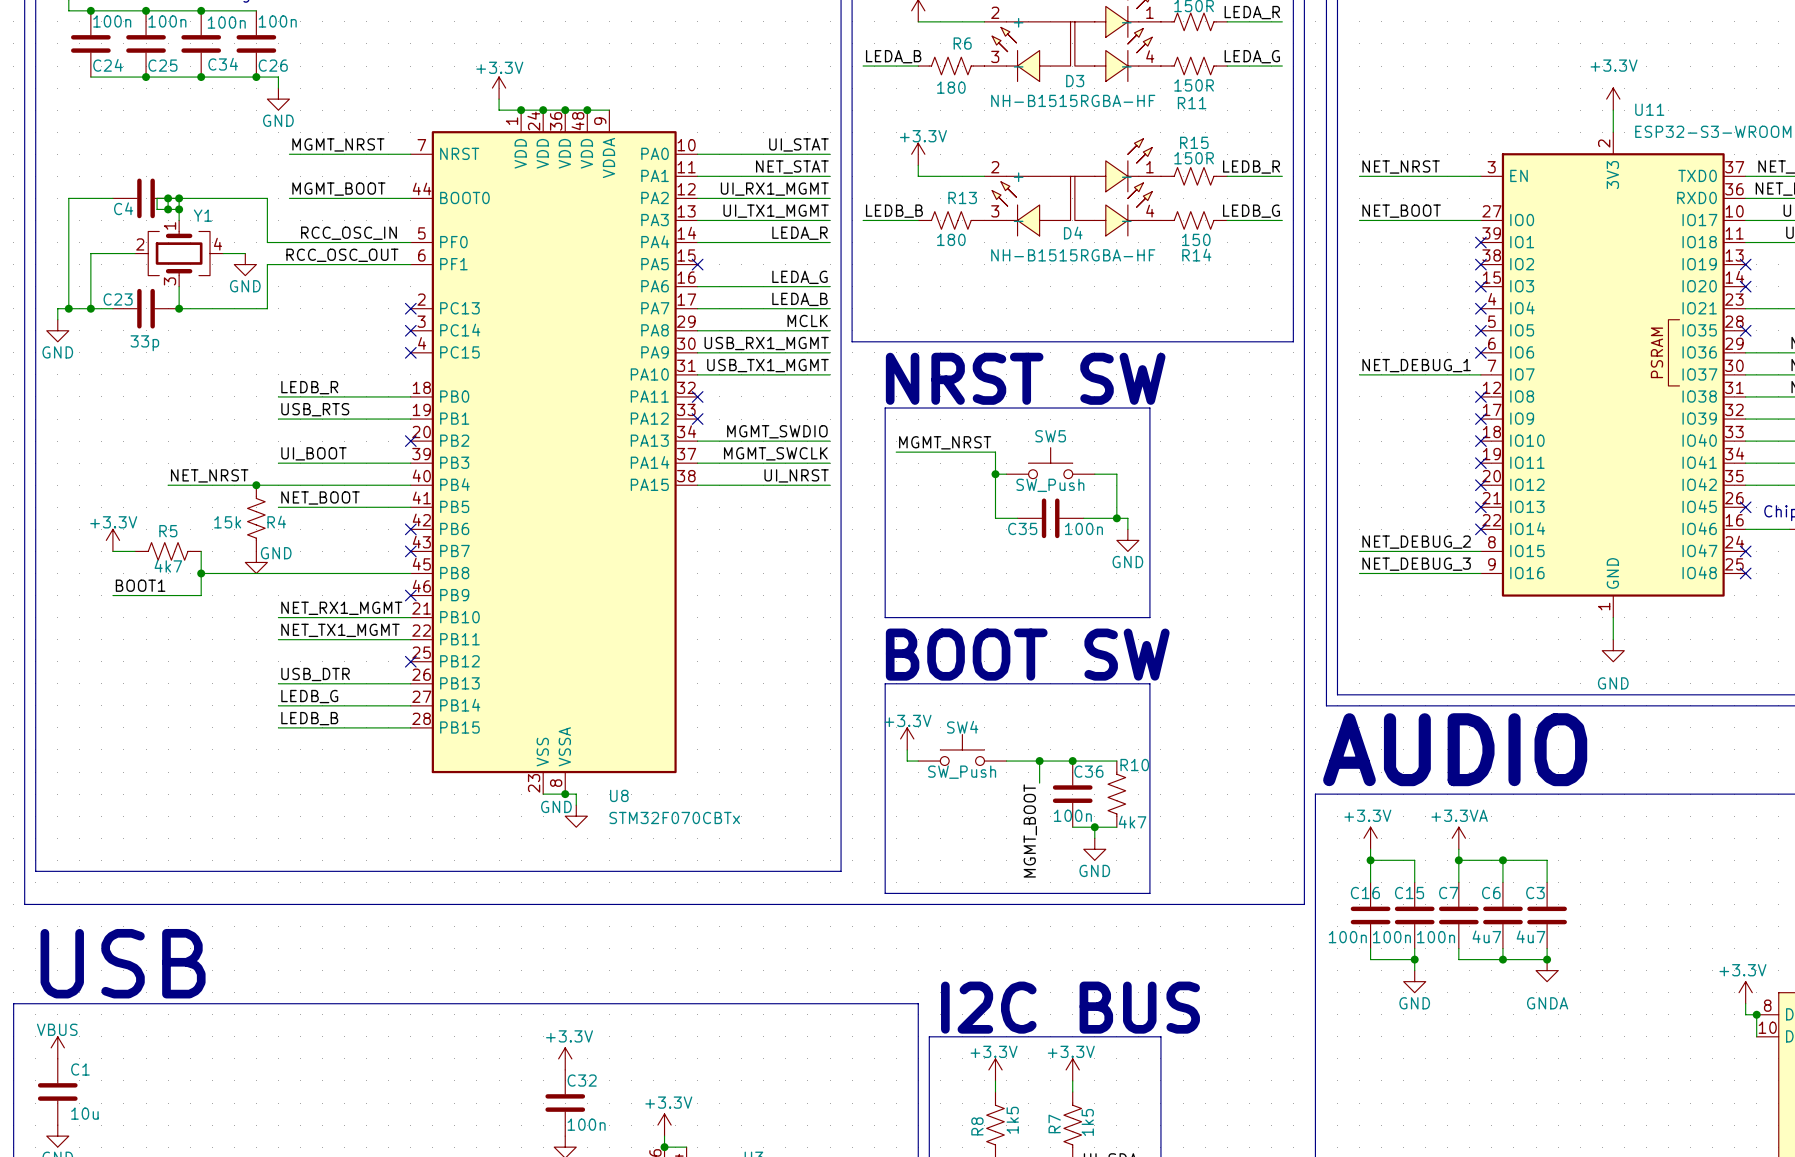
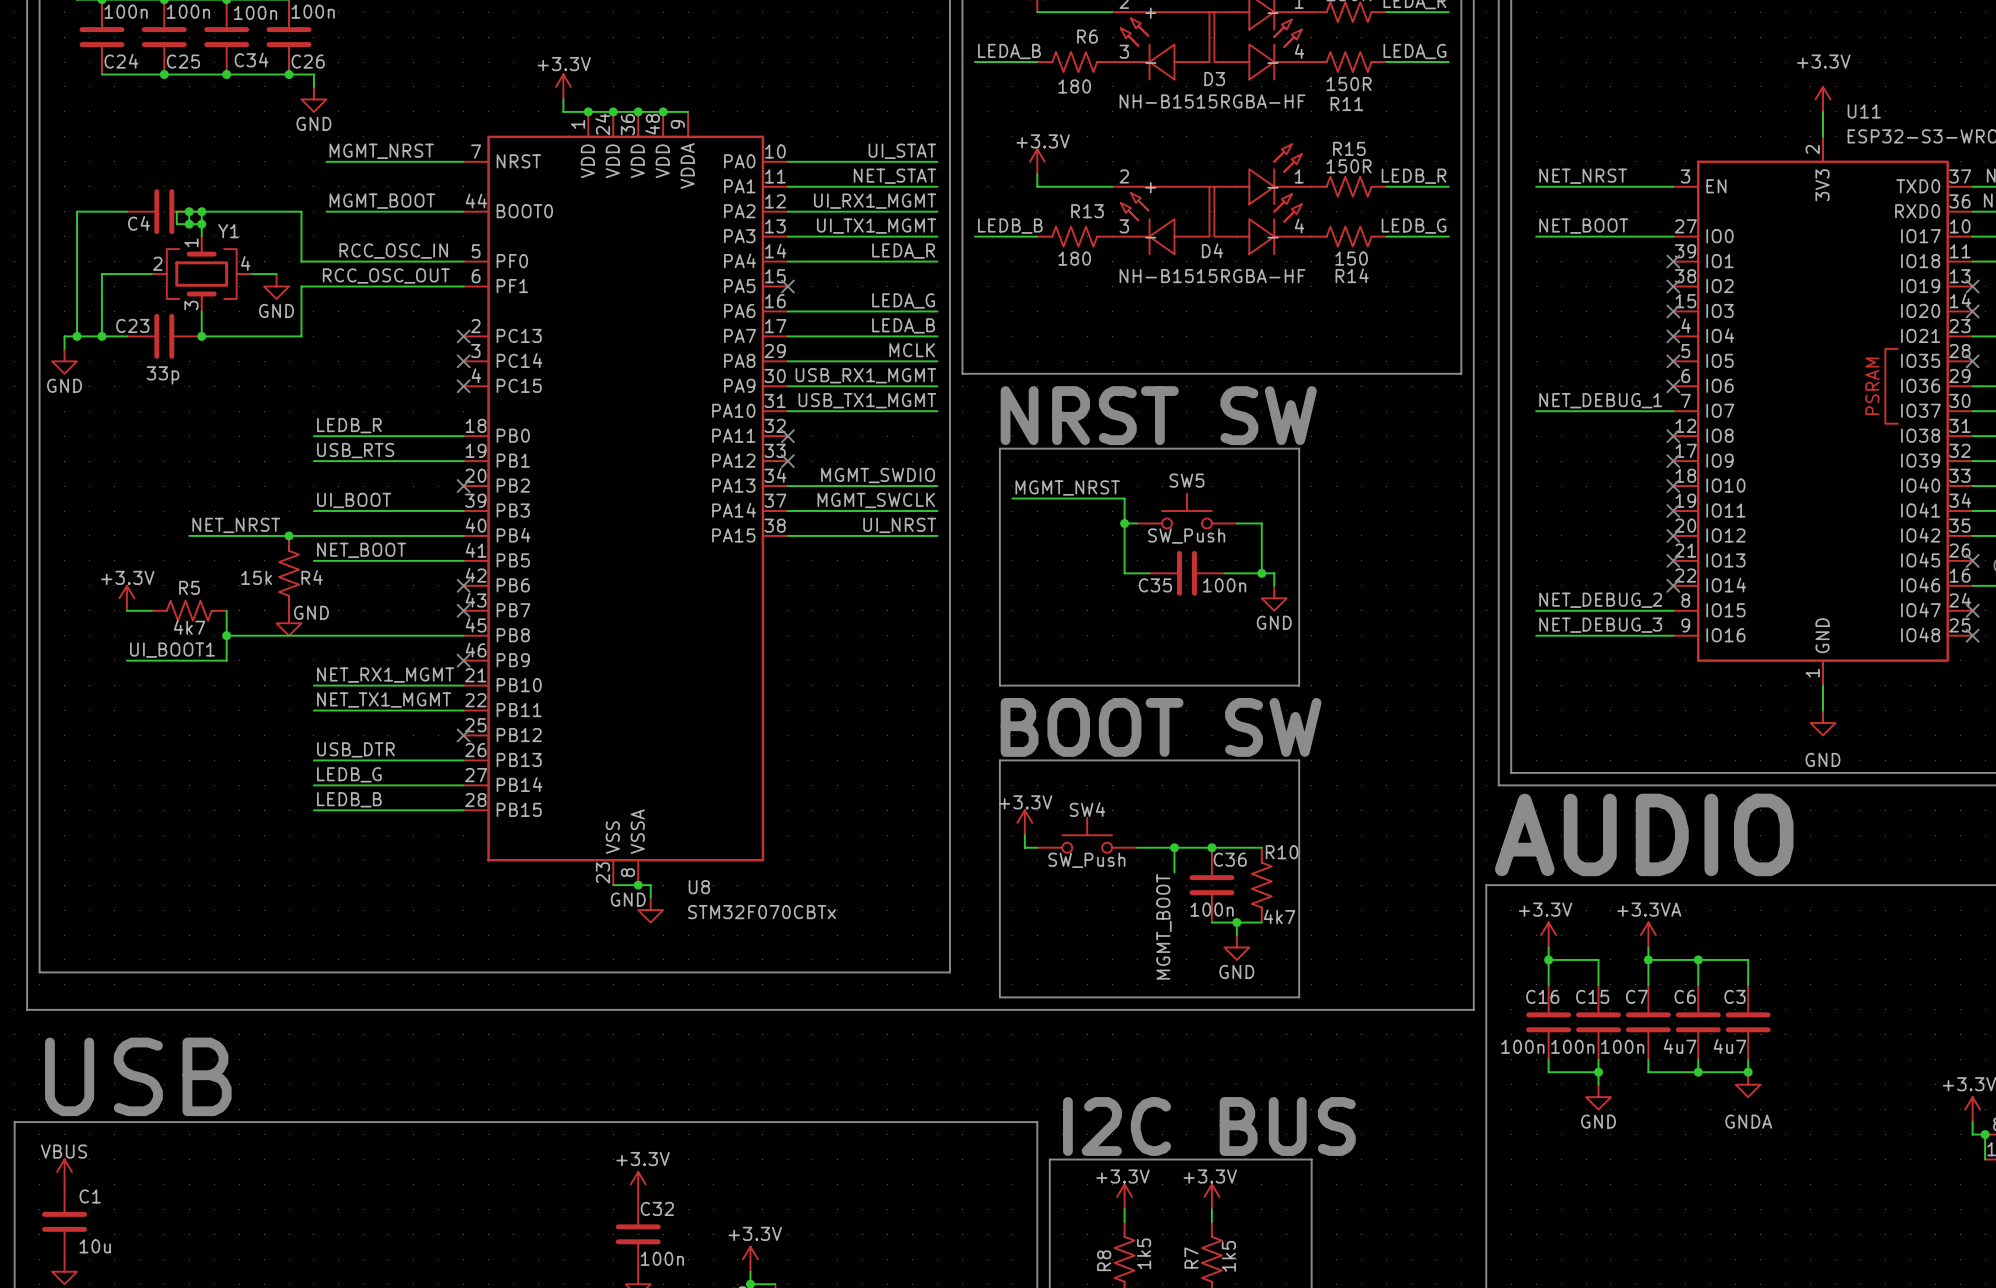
label: BOOT1 (140, 585) -> UI_BOOT1 (172, 650)

